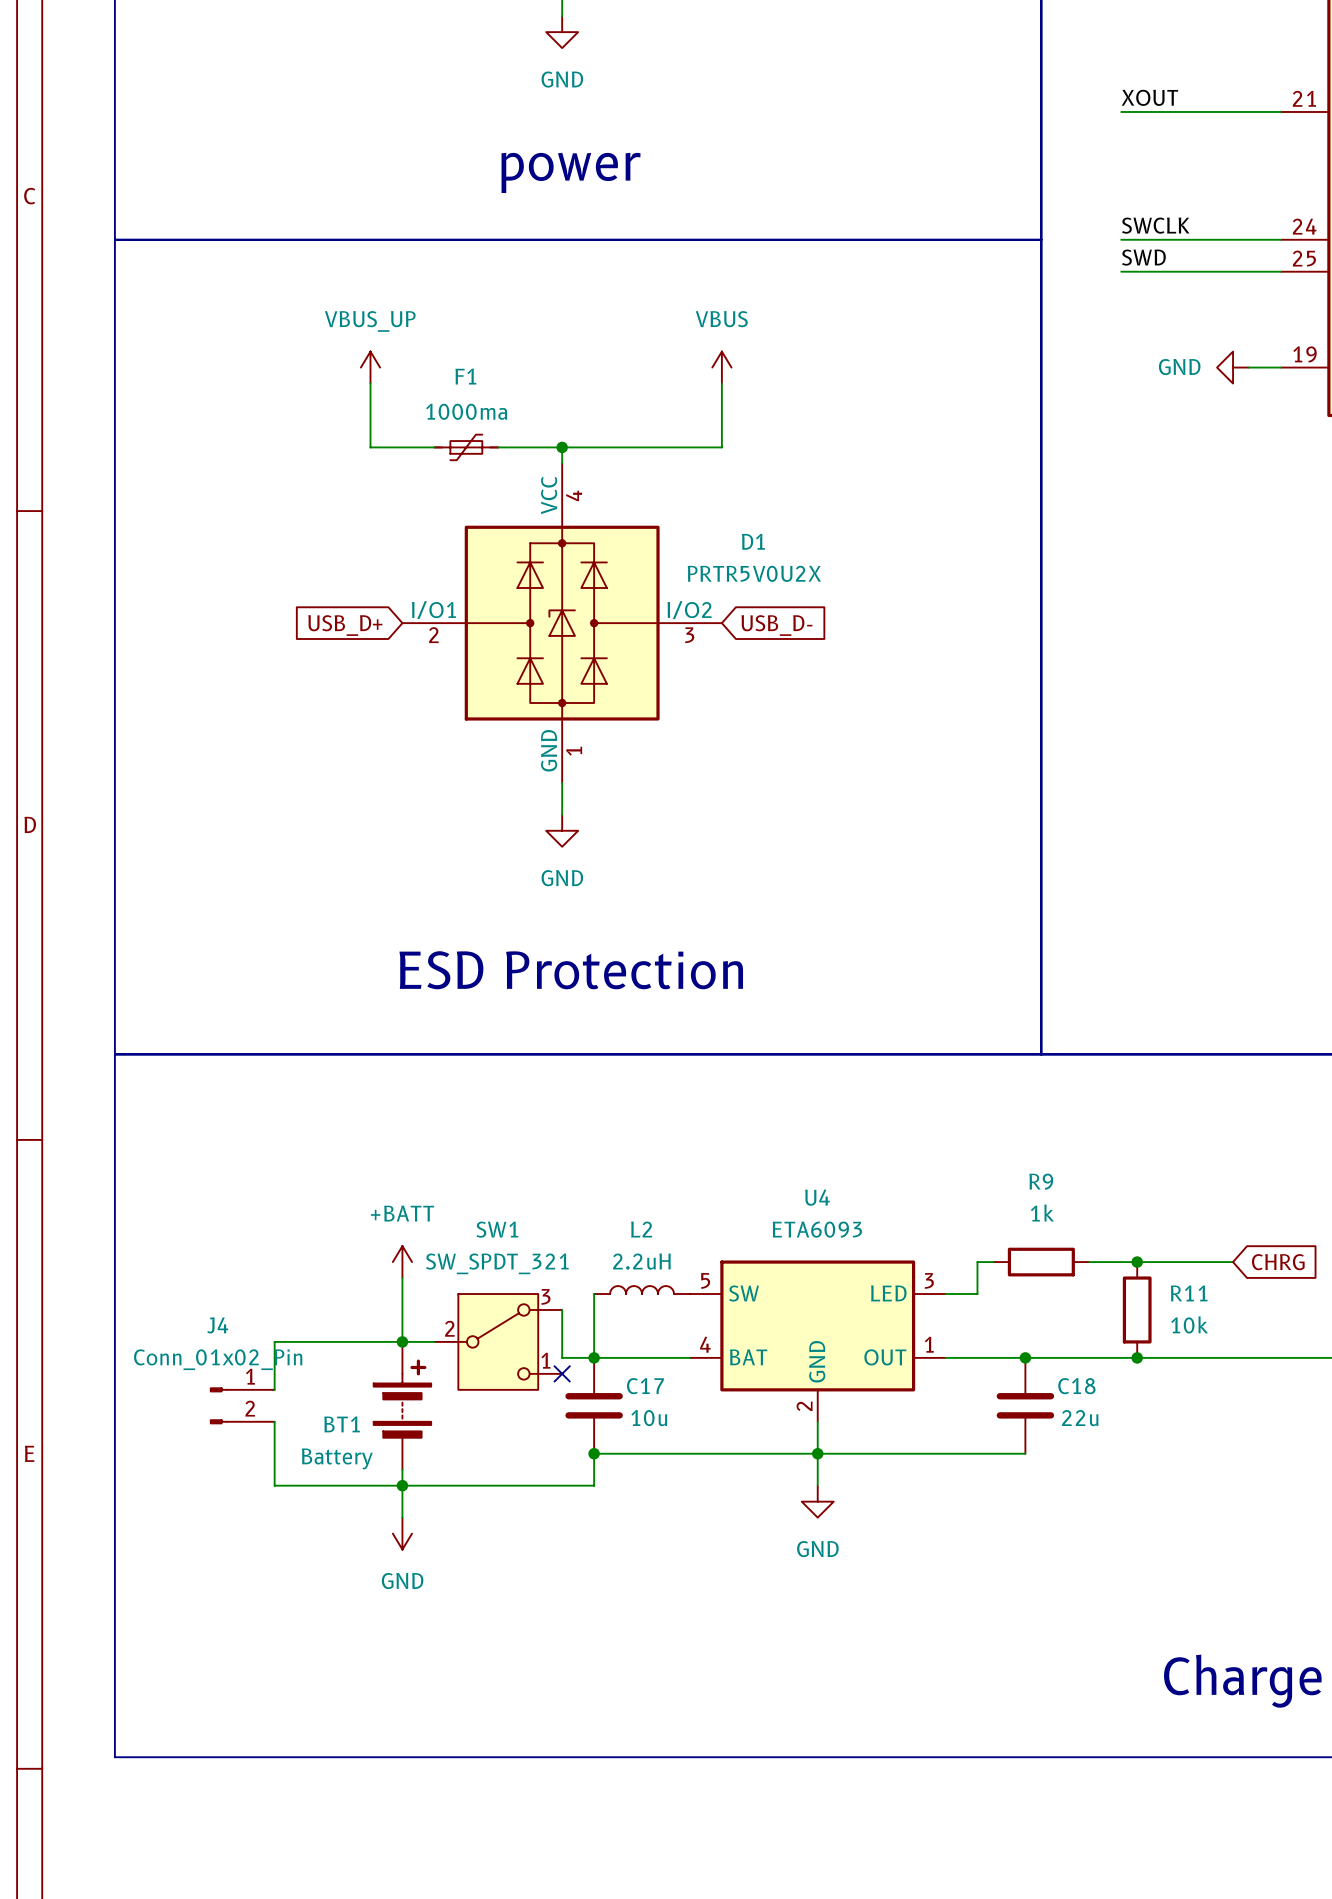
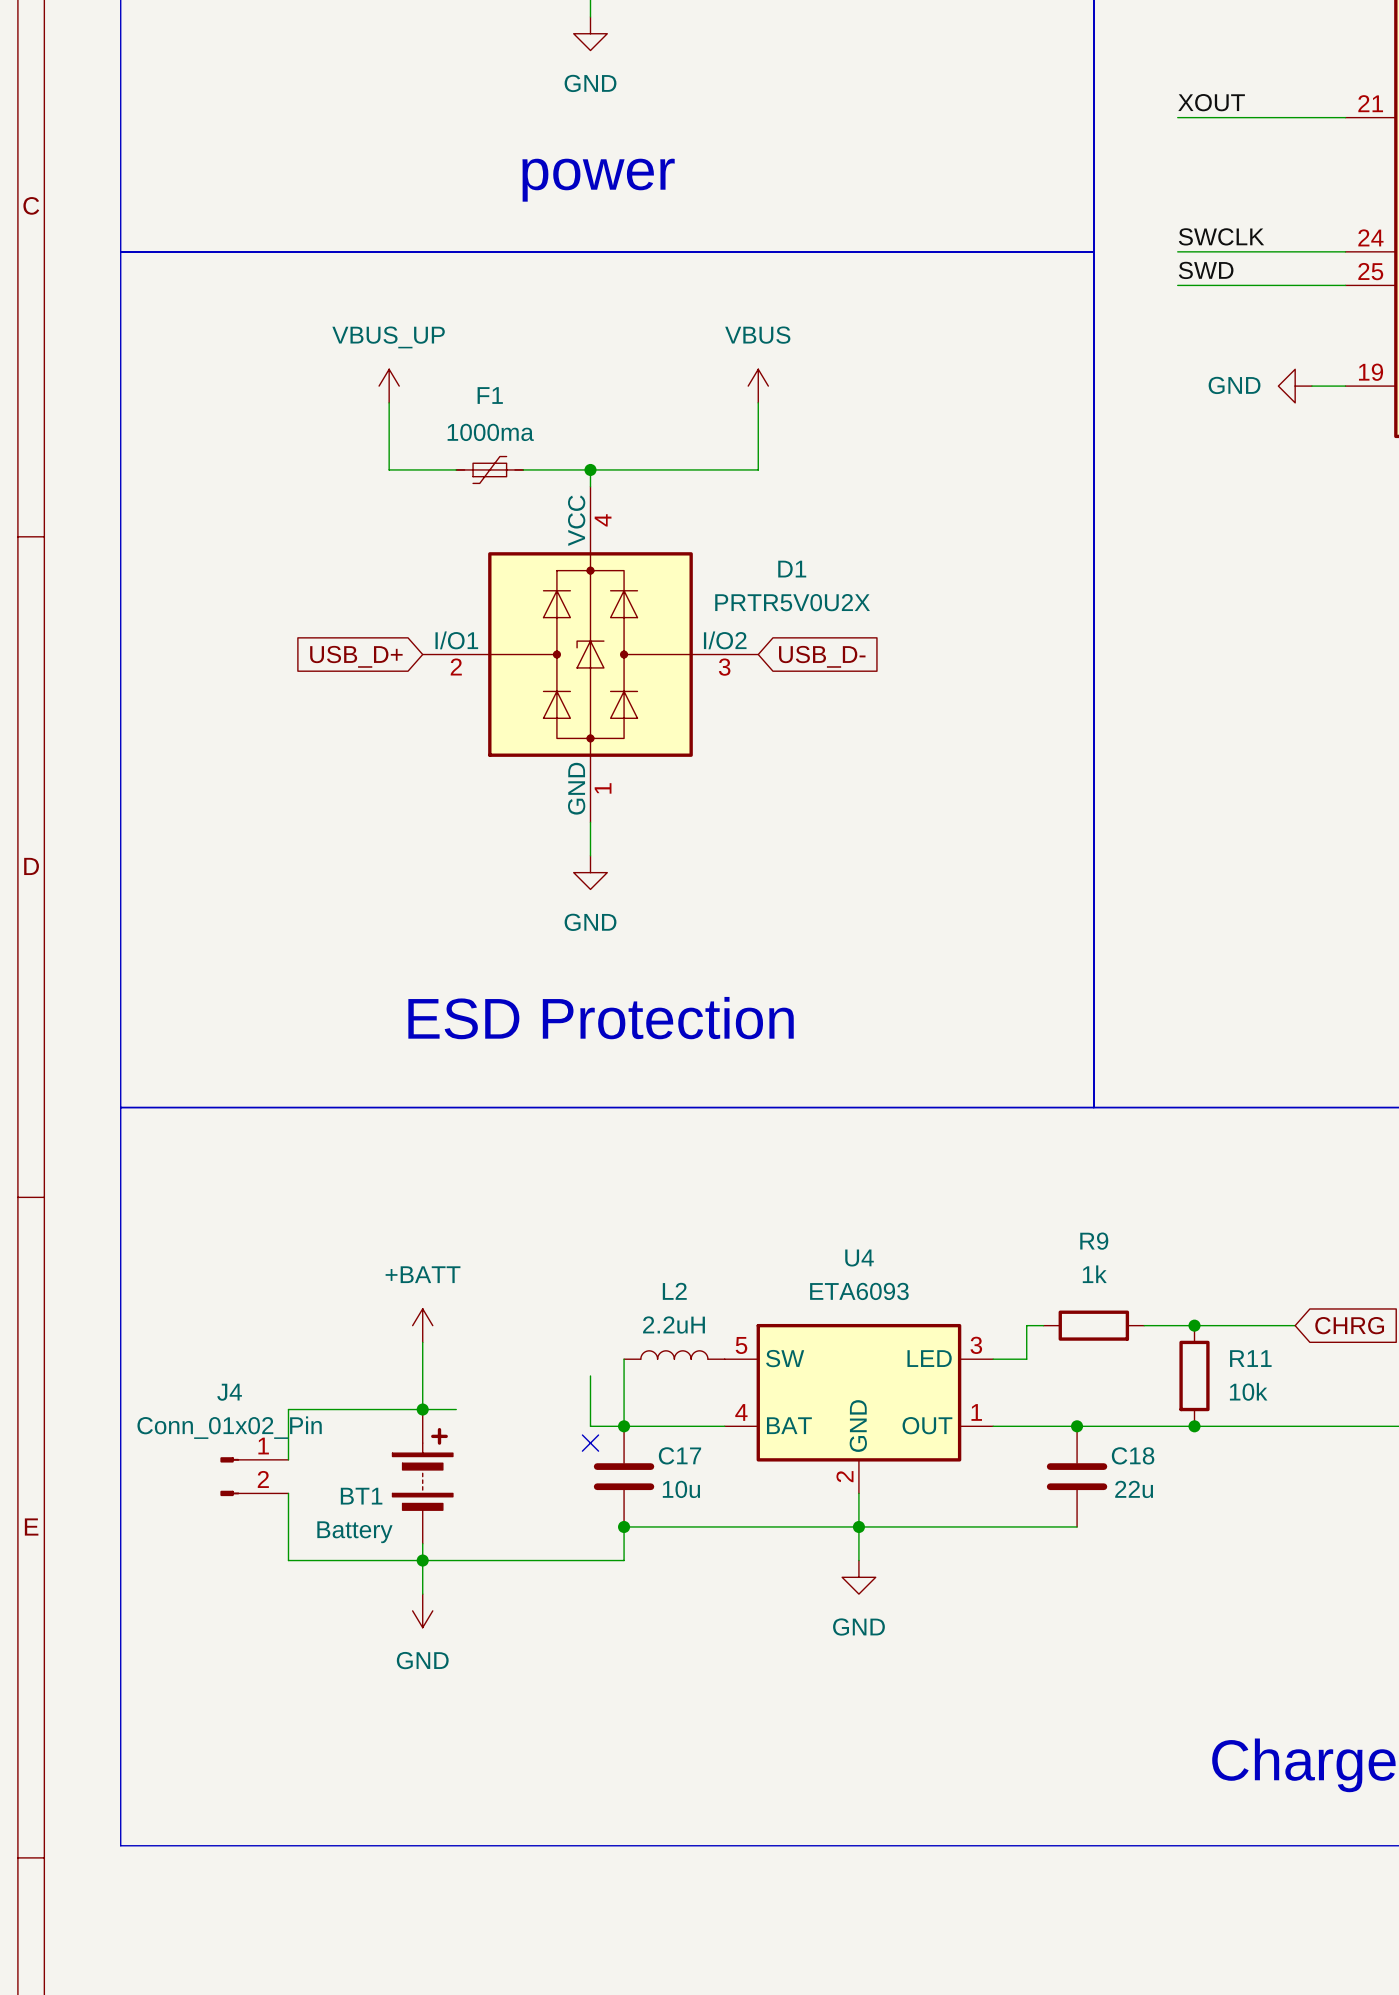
SW1: SW_SPDT_321 (498, 1341) -> none

